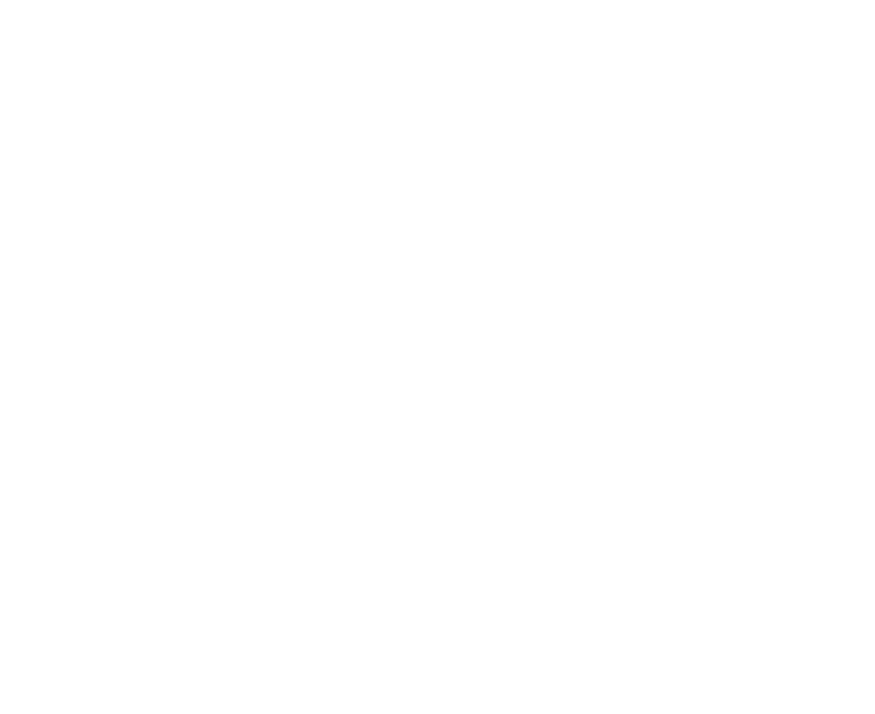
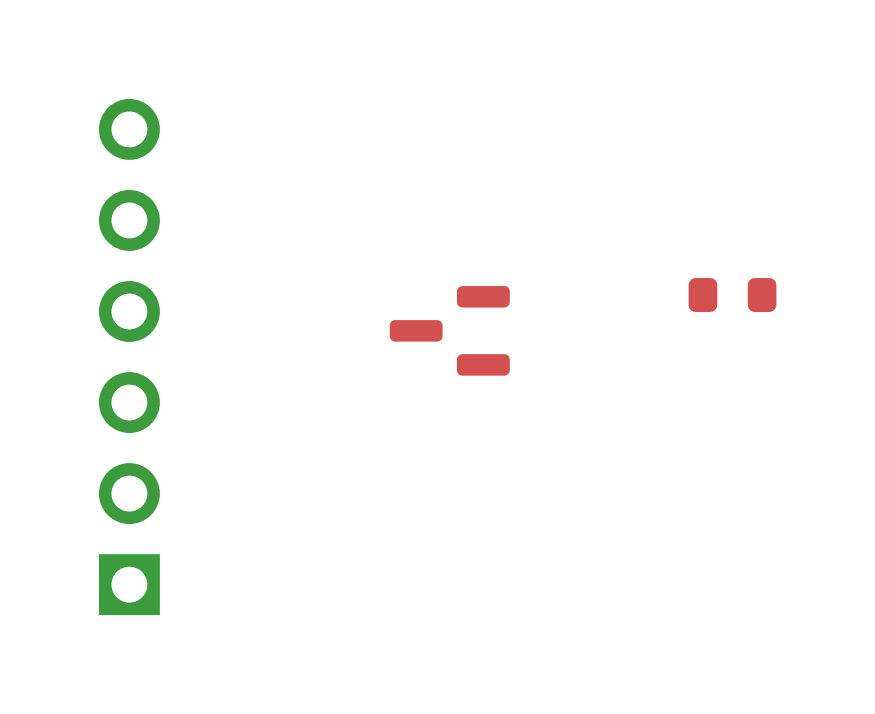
part: none -> (732, 295)
part: none -> (449, 330)
part: none -> (129, 357)

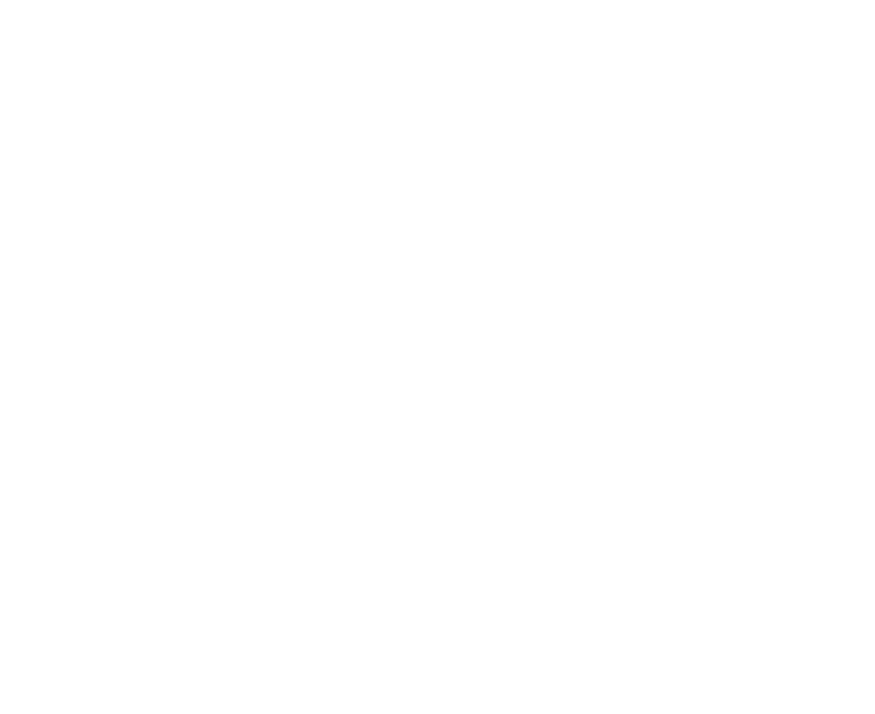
part: (732, 295) -> none
part: (449, 330) -> none
part: (129, 357) -> none

